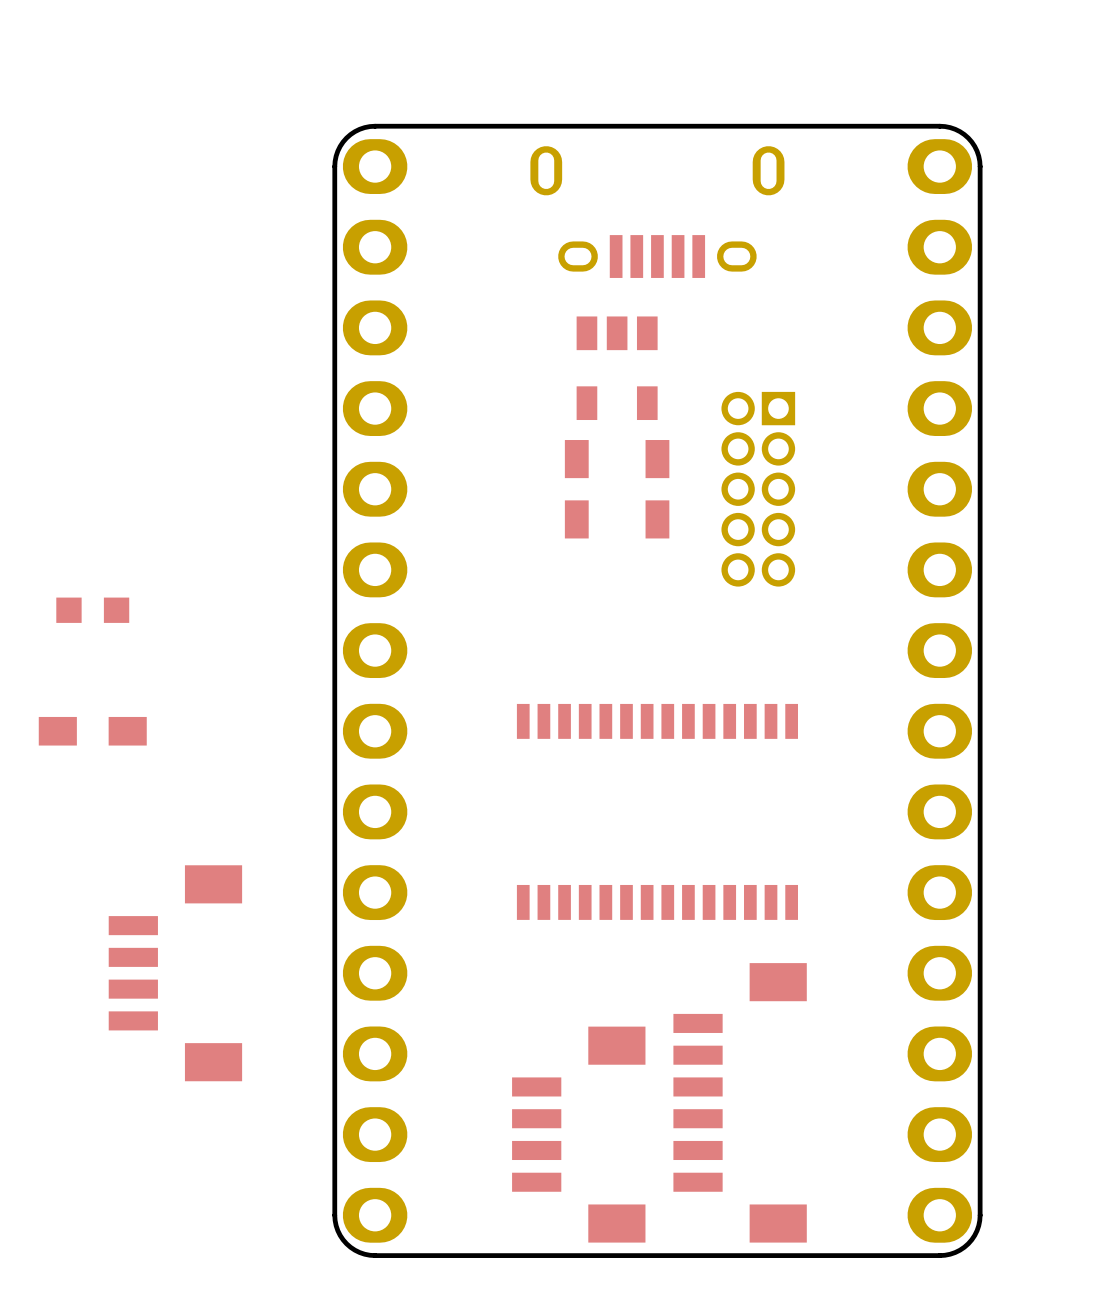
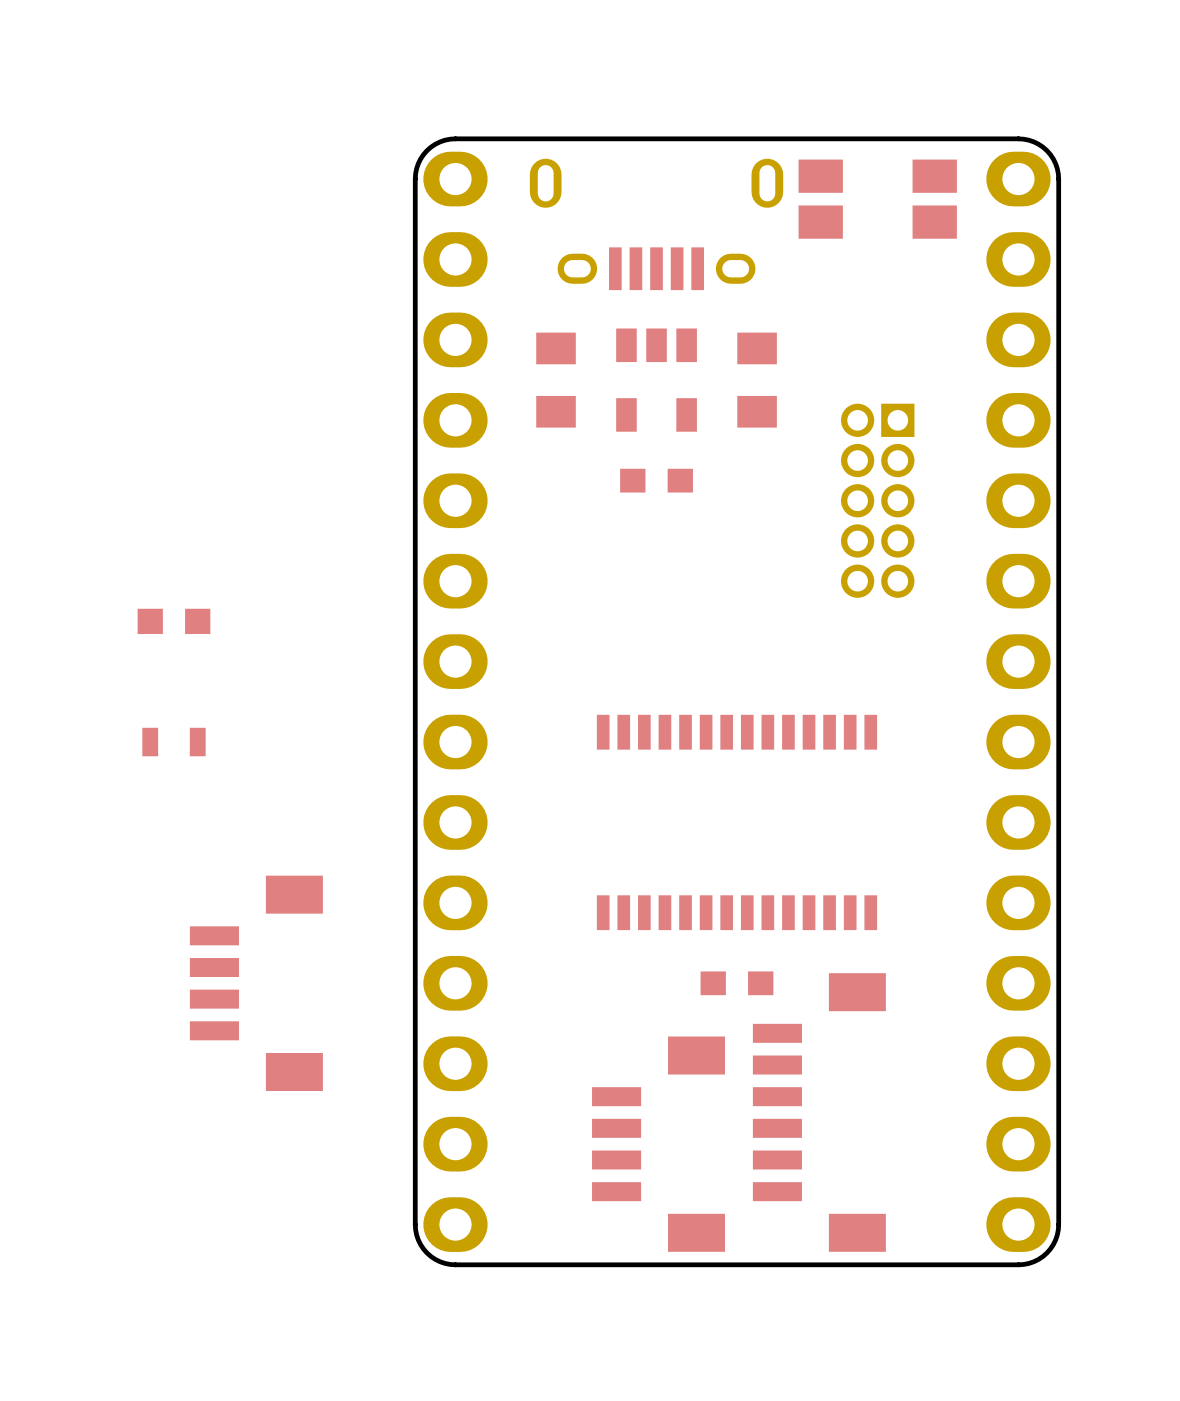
part: none -> (877, 199)
part position: (657, 212) -> (656, 224)
part: none -> (556, 380)
part position: (617, 368) -> (656, 380)
part: none -> (757, 380)
part footprint: [564, 440, 589, 539] -> [620, 468, 693, 493]
part: (657, 489) -> none
part position: (758, 489) -> (877, 500)
part footprint: [38, 716, 147, 746] -> [142, 727, 206, 757]
part: none -> (736, 983)

